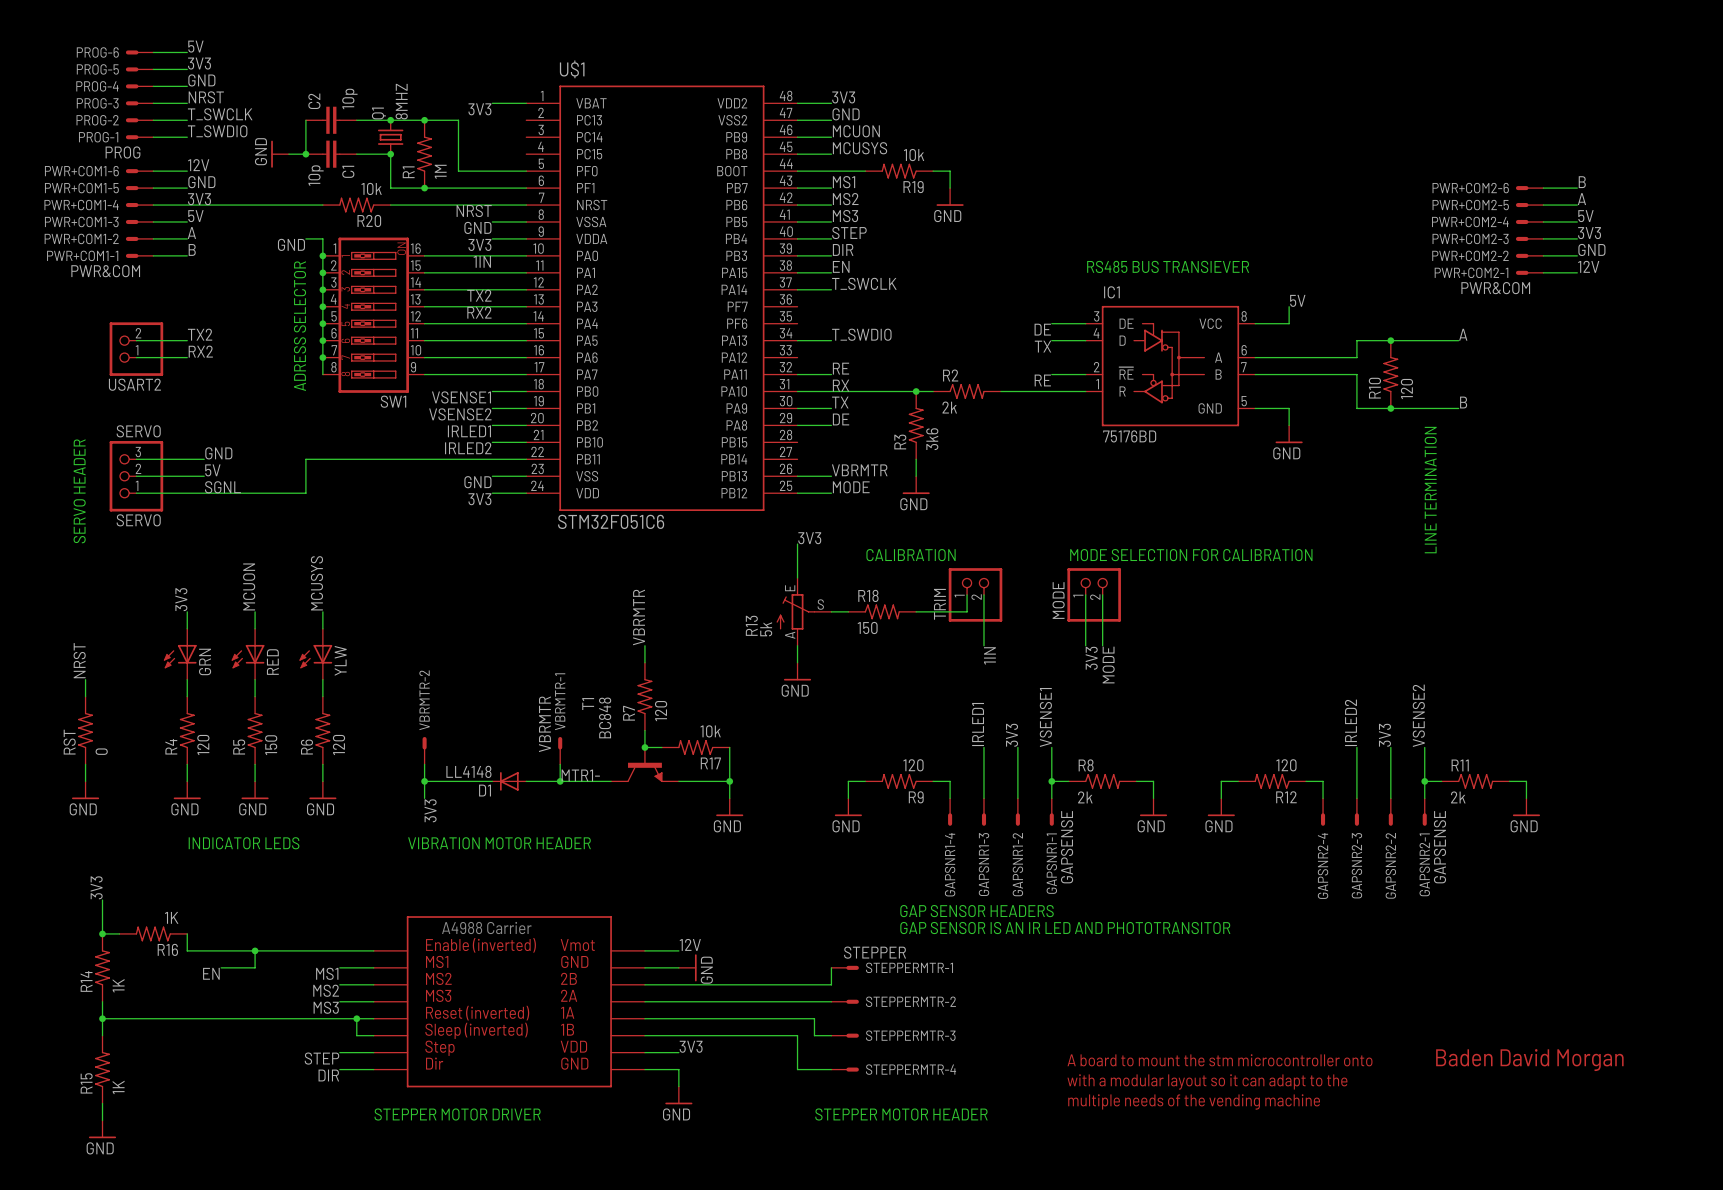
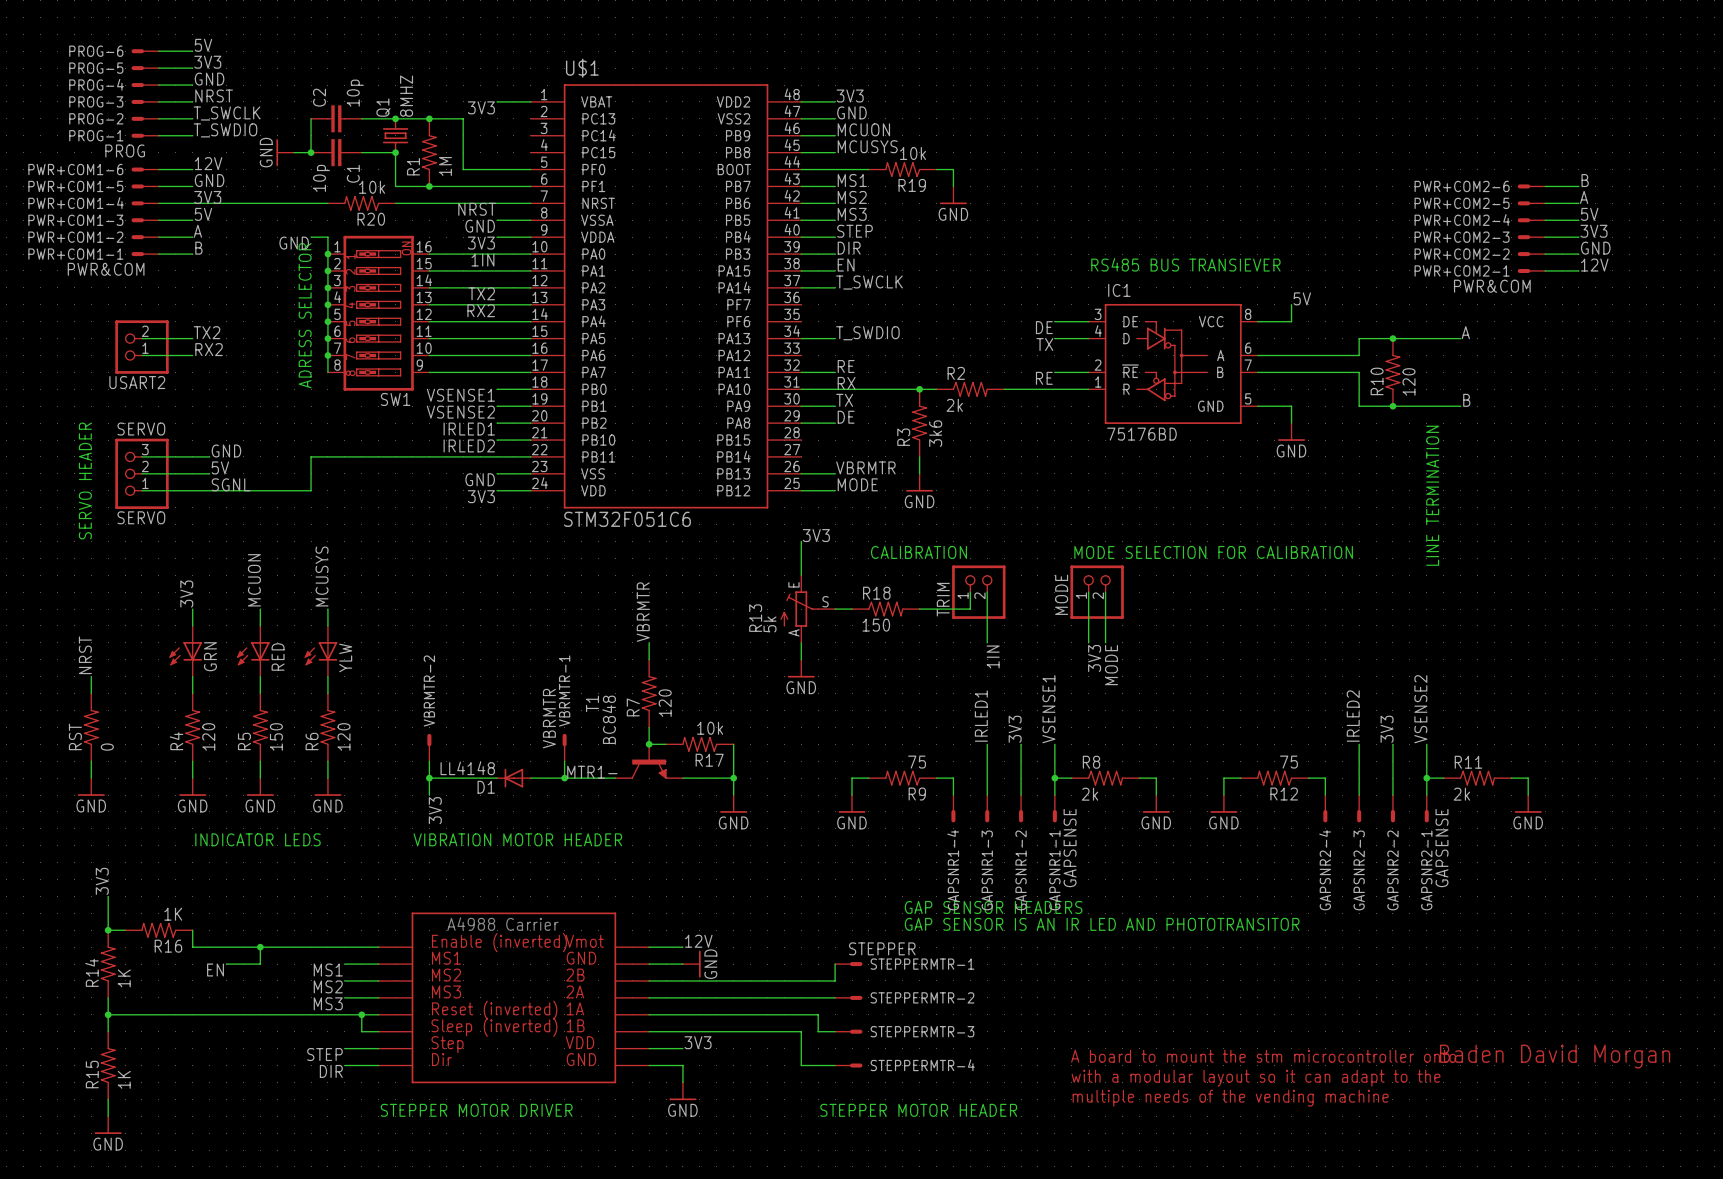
R9 value: 120 (913, 765) -> 75 (917, 762)
R12 value: 120 (1286, 765) -> 75 (1288, 762)

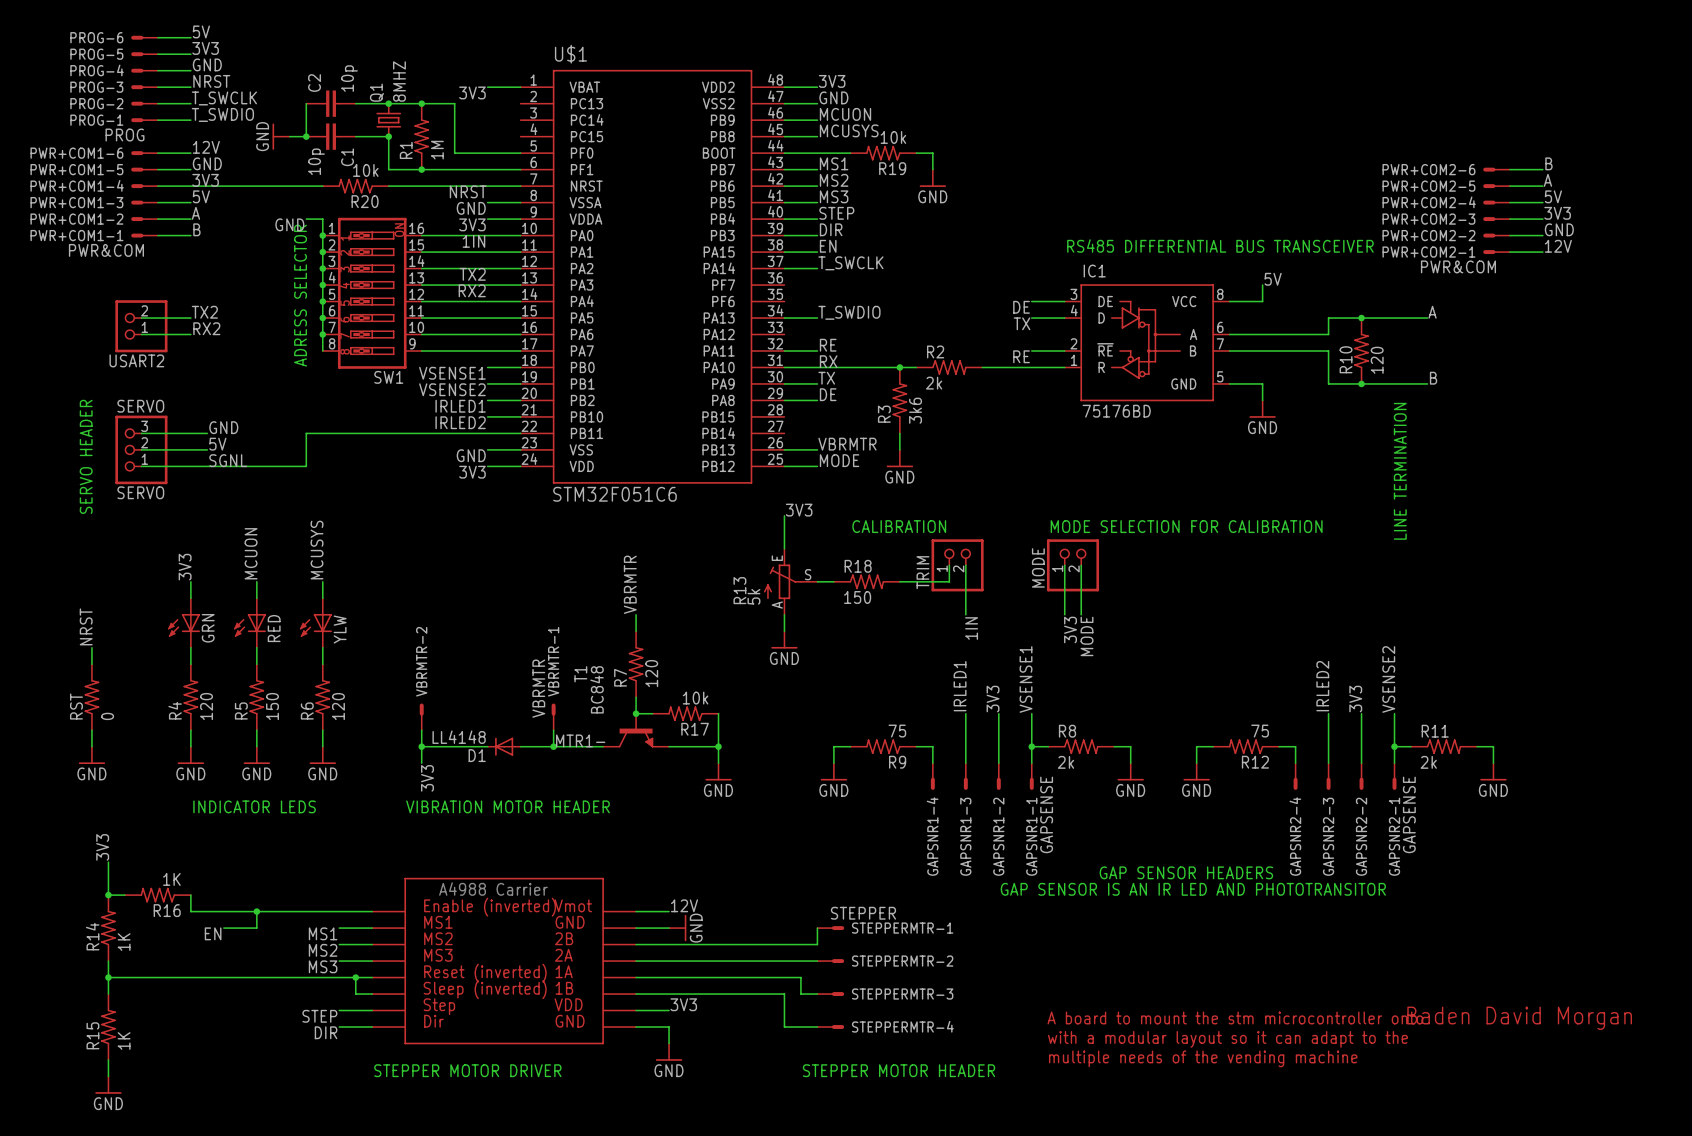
text: RS485 BUS TRANSIEVER (1185, 264) -> RS485 DIFFERENTIAL BUS TRANSCEIVER (1220, 246)
text: GAP SENSOR HEADERS (993, 907) -> none
text: none -> GAP SENSOR HEADERS (1186, 872)
text position: GAP SENSOR IS AN IR LED AND PHOTOTRANSITOR (1102, 924) -> GAP SENSOR IS AN IR LED AND PHOTOTRANSITOR (1193, 889)

